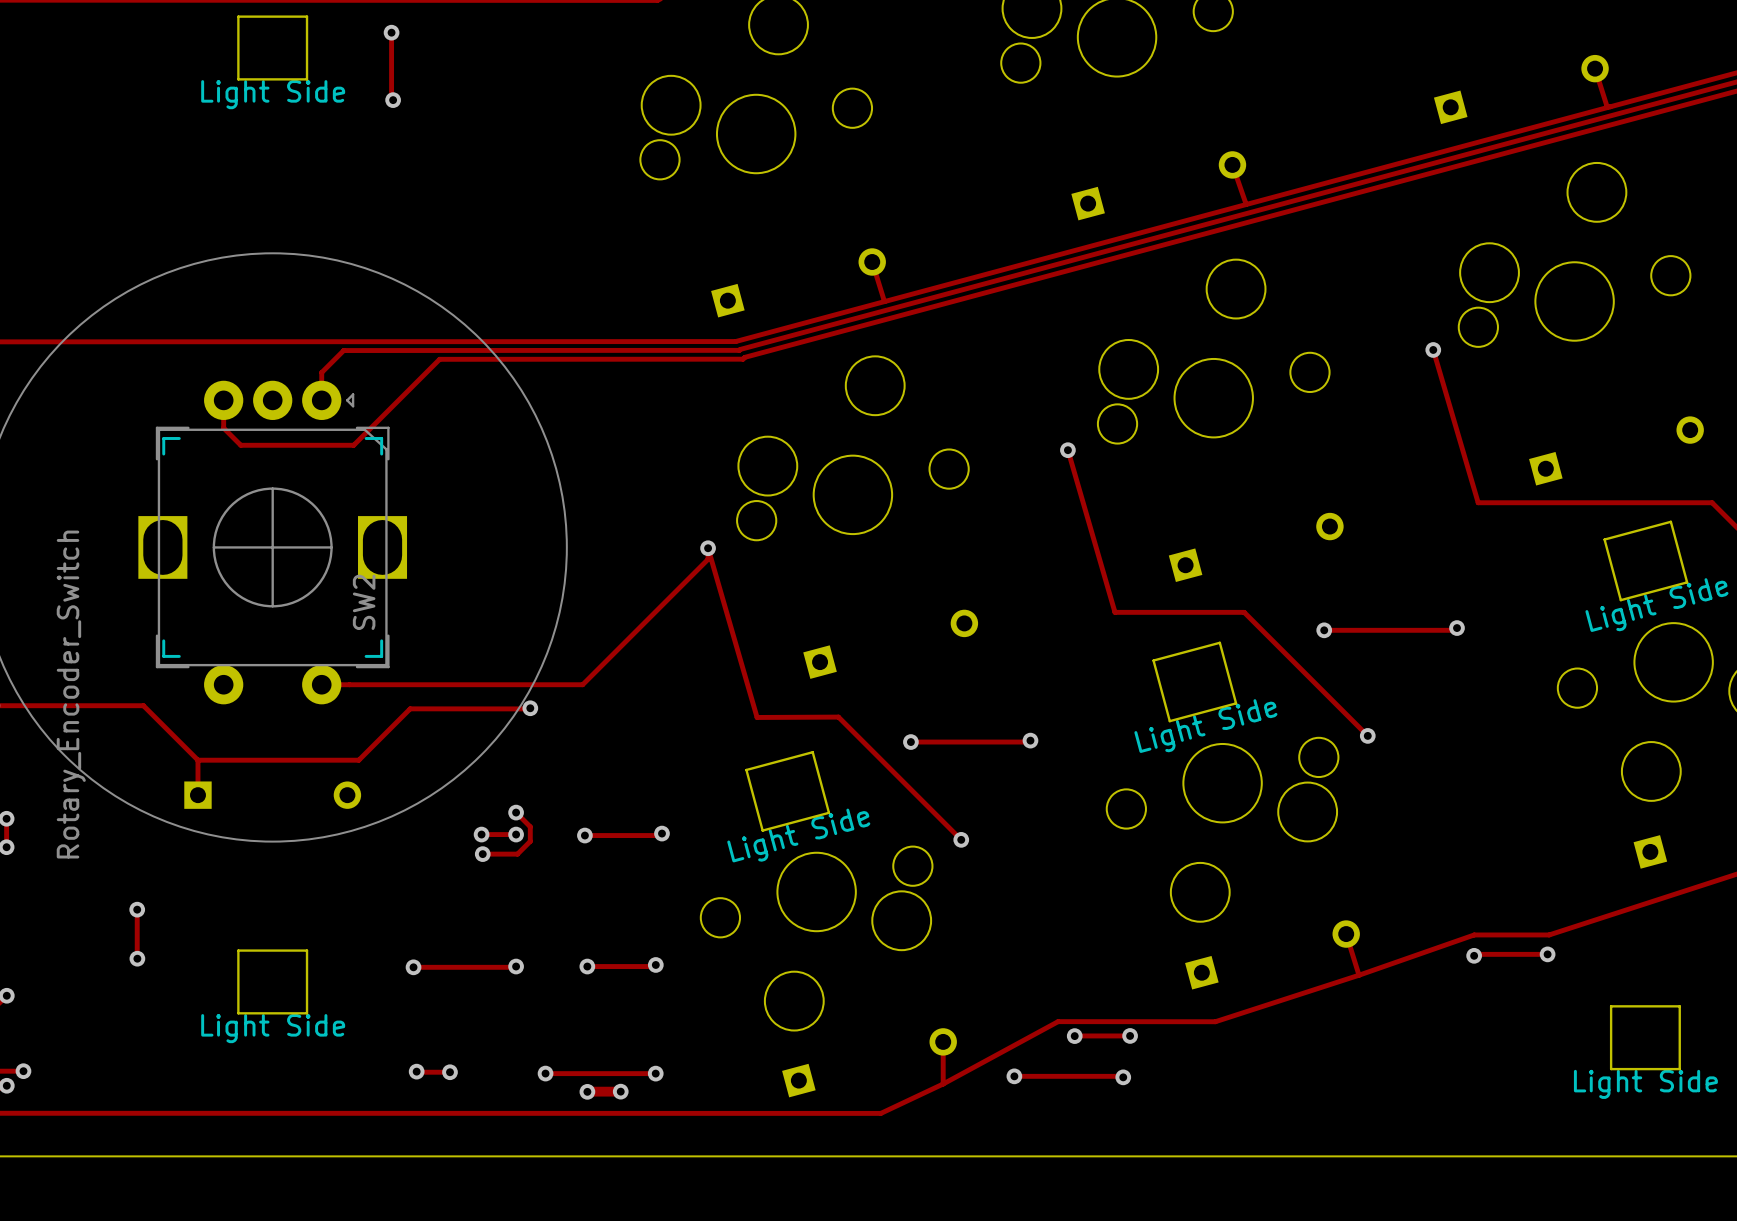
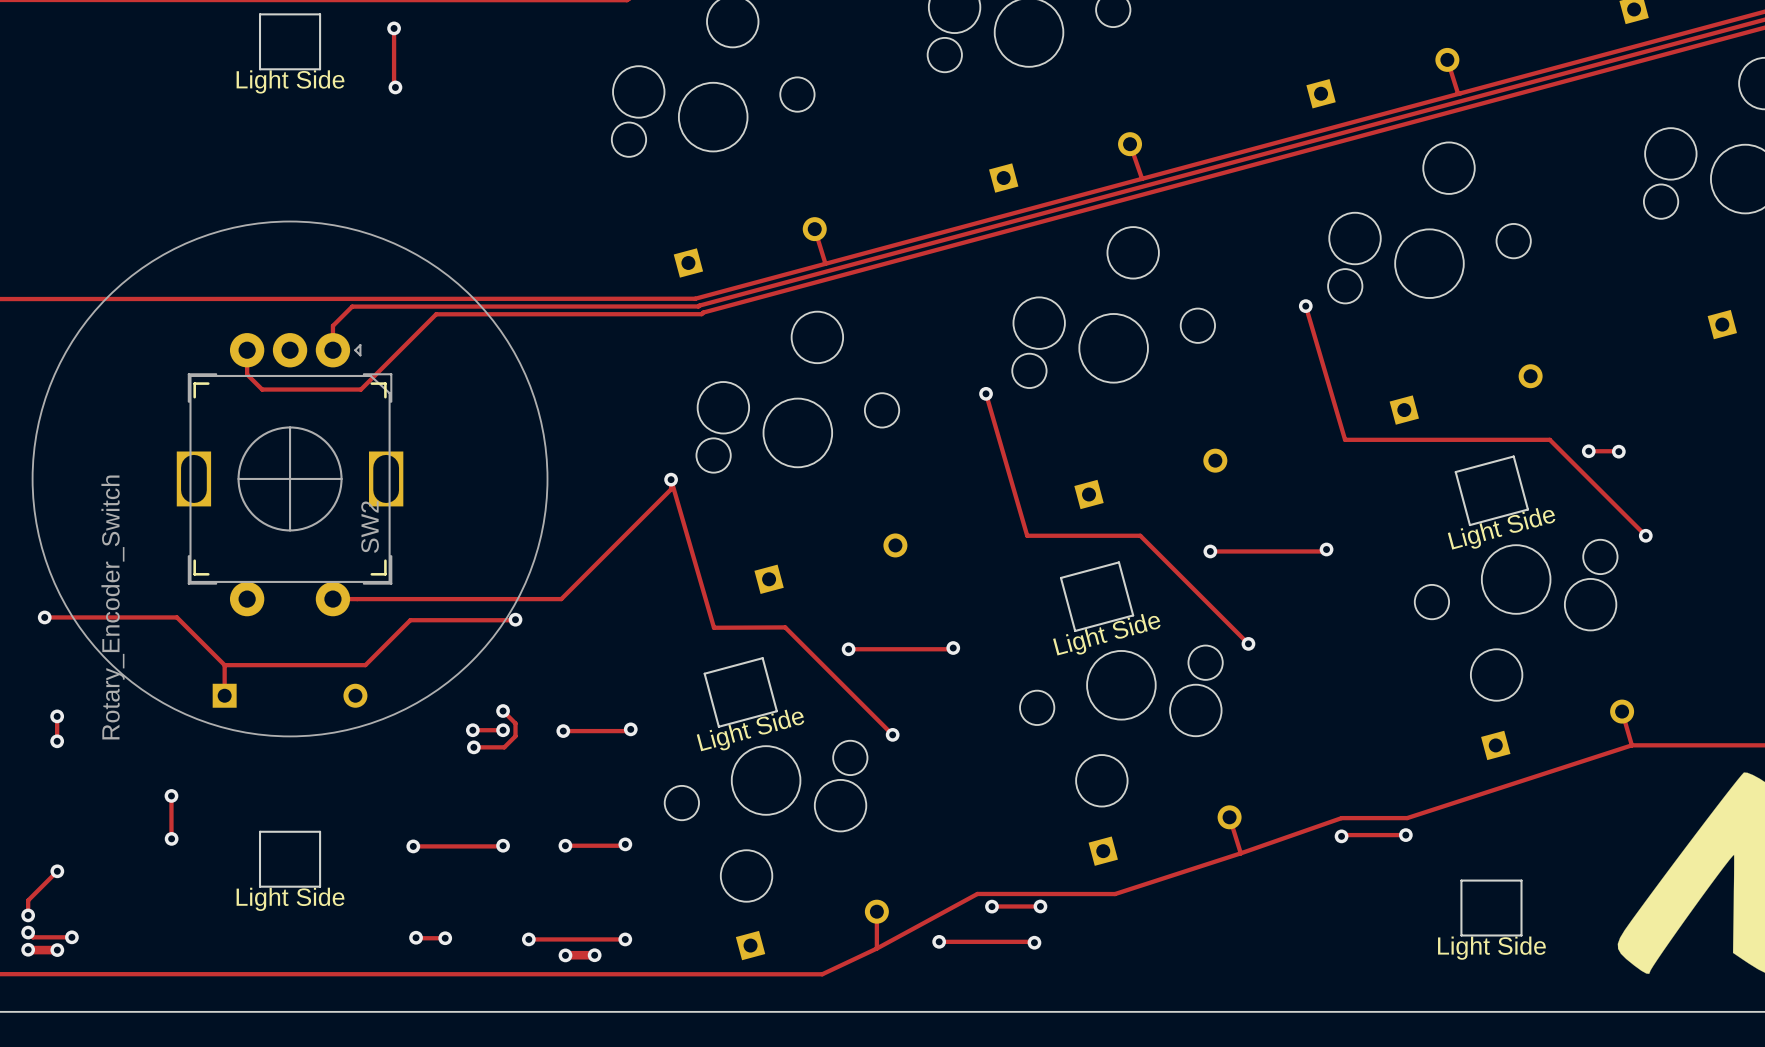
SW2 footprint: [138, 380, 408, 705] -> [176, 333, 404, 617]

